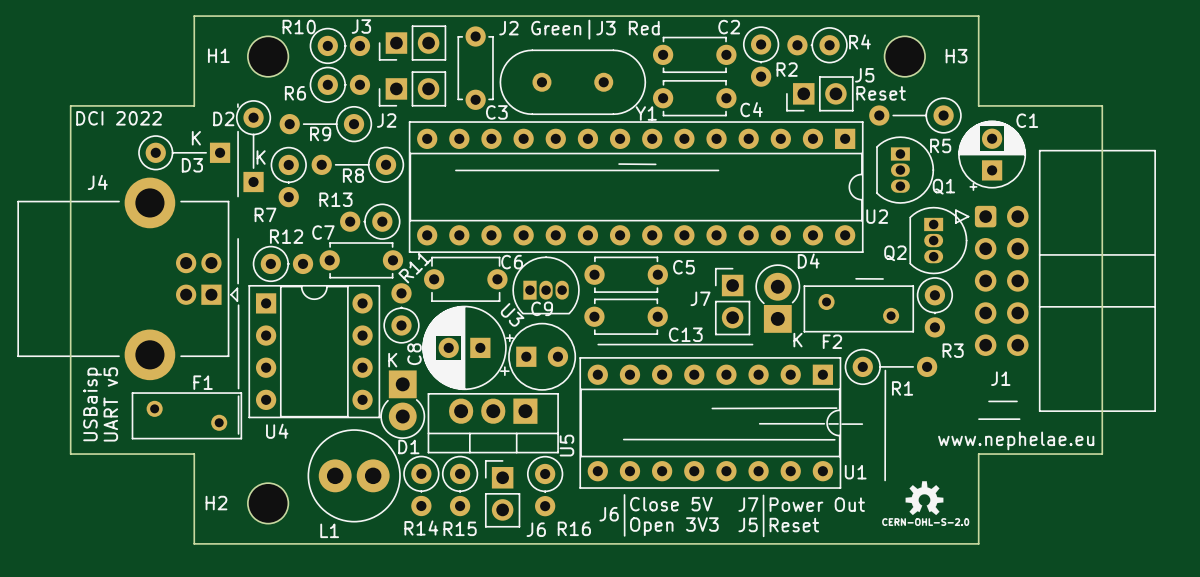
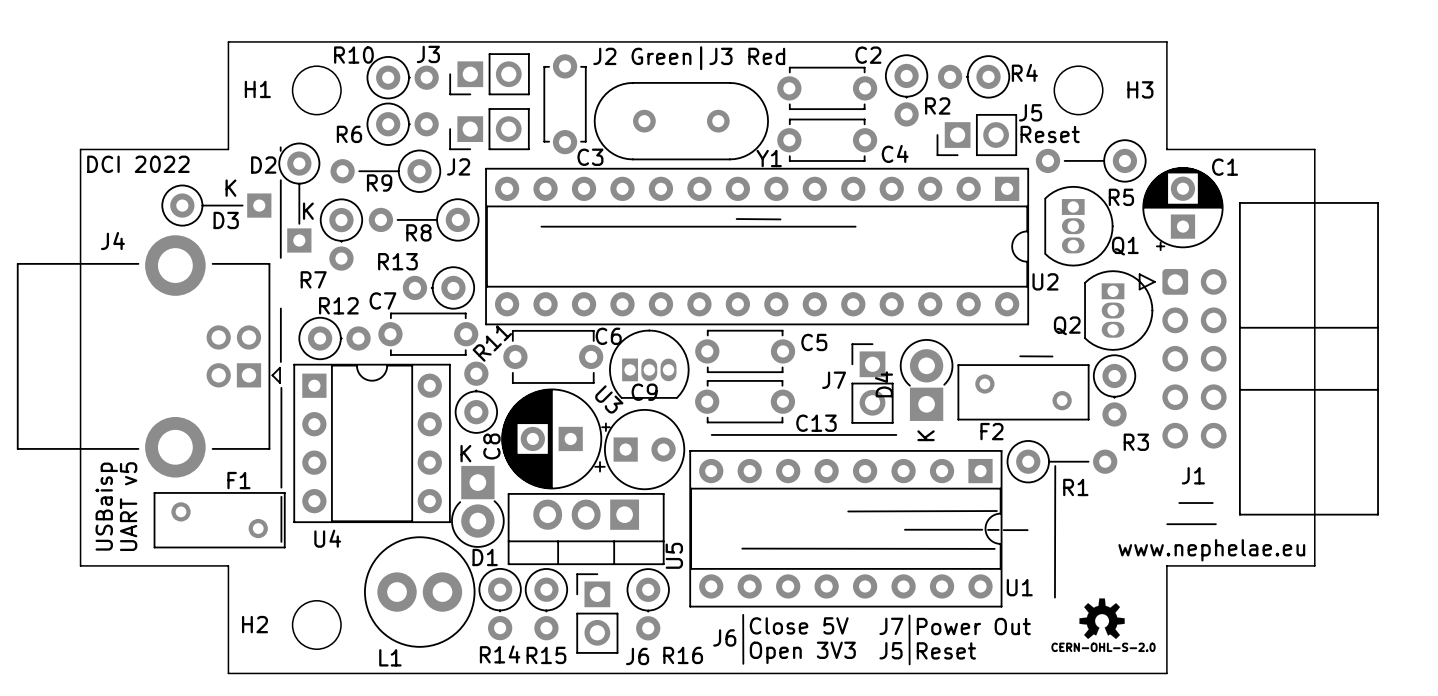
D4 name rotation: 0° (808, 261) -> 90° counterclockwise (884, 384)
D4 name position: D4 (808, 261) -> D4 (884, 384)
D4 text rotation: 0° (797, 340) -> 90° counterclockwise (926, 435)

